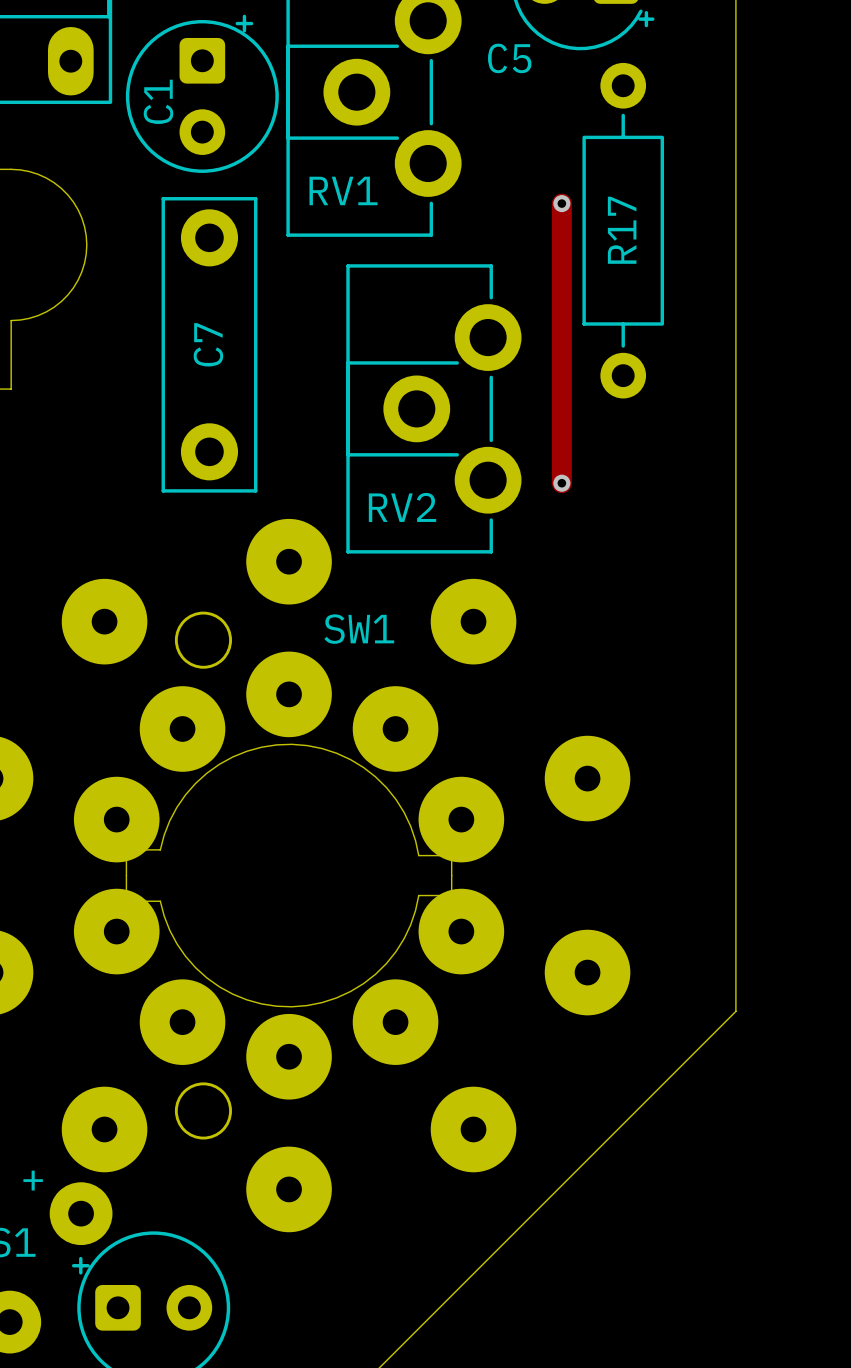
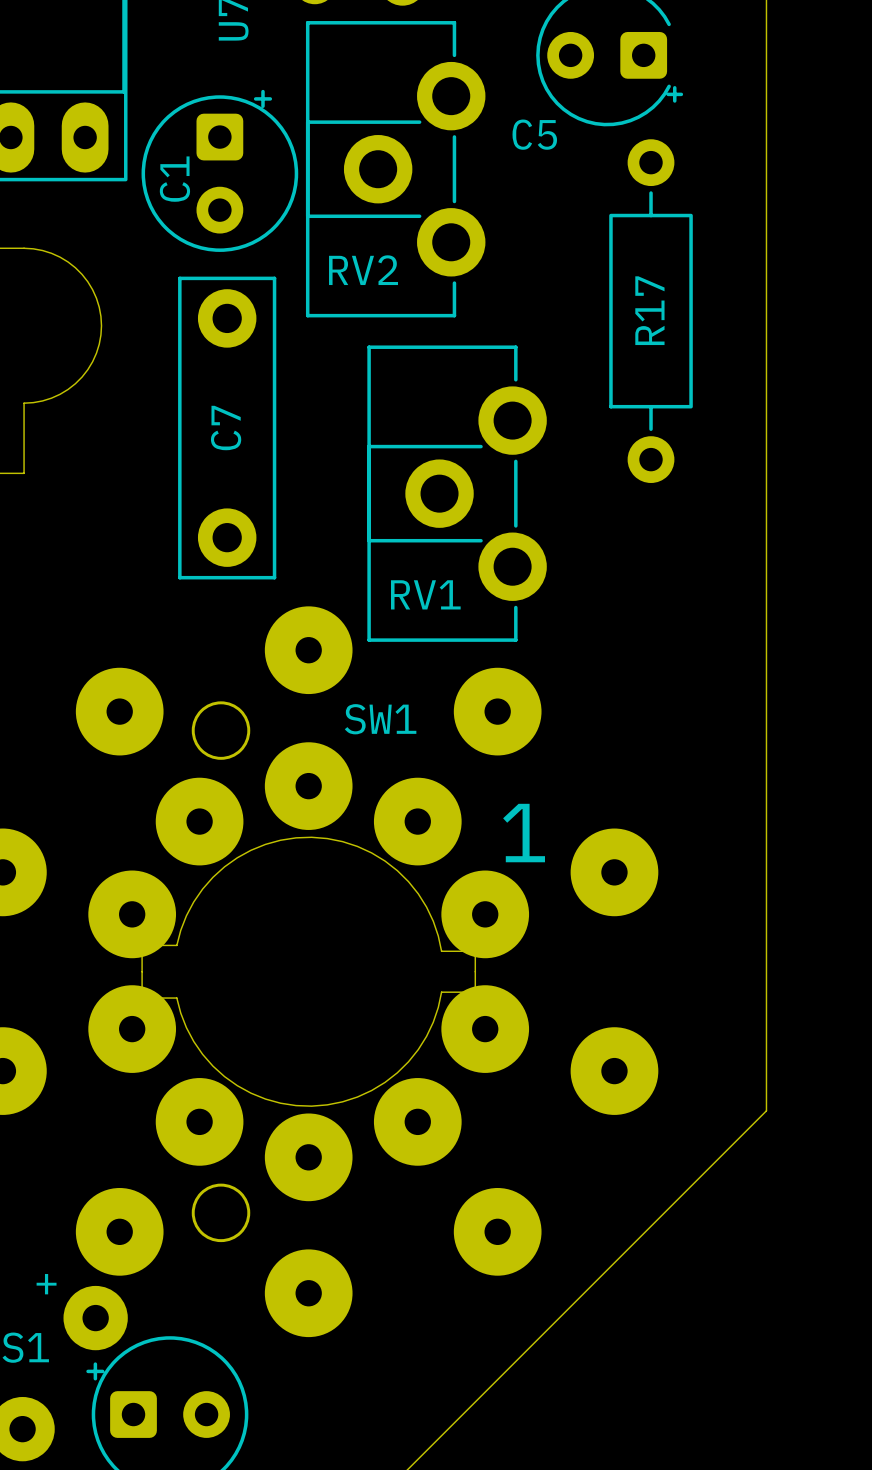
RV1 name: RV1 (343, 190) -> RV2 (363, 270)
track: (561, 203) (561, 483) -> none
via: (561, 203) -> none
via: (561, 483) -> none
RV2 name: RV2 (402, 507) -> RV1 (425, 594)
SW1 text: none -> 1 (524, 833)

